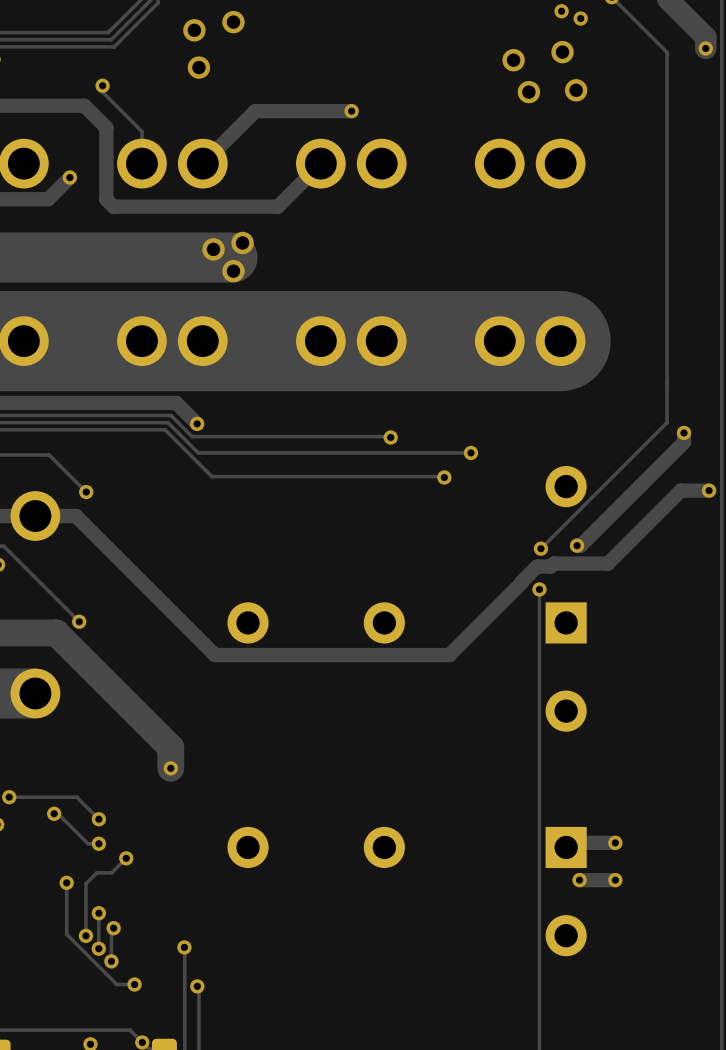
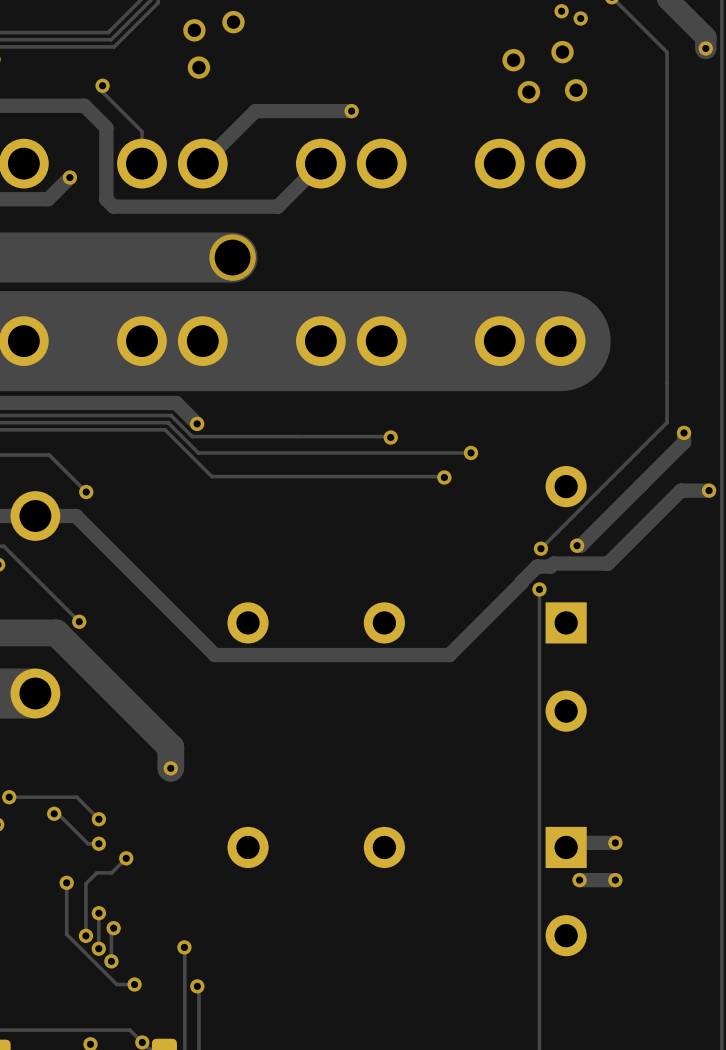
via: (242, 243) -> none
via: (213, 249) -> none
via: none -> (232, 257)
via: (233, 271) -> none

